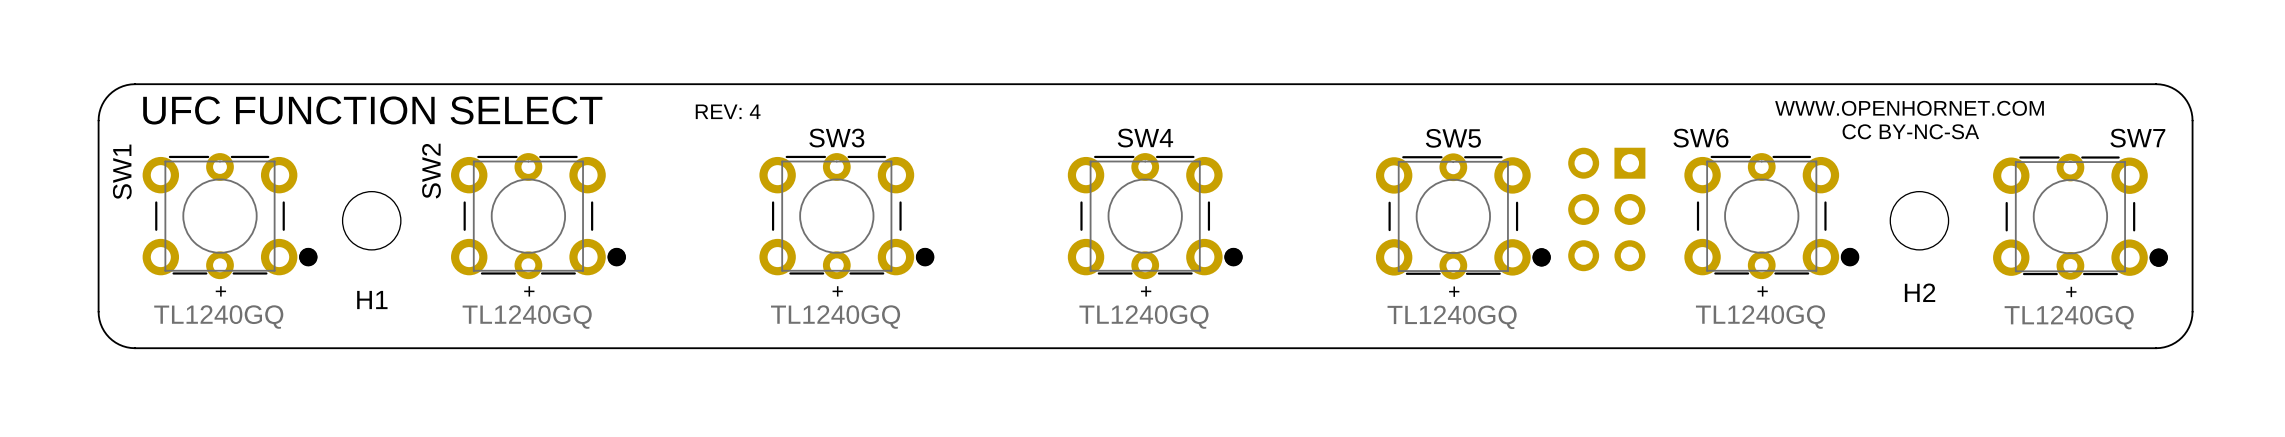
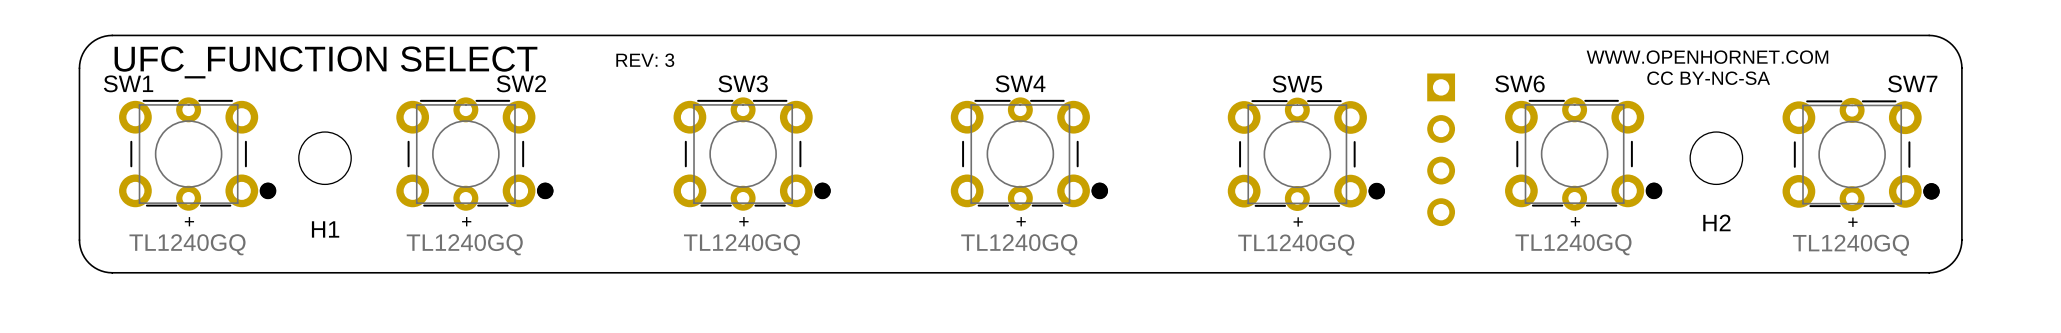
text: UFC FUNCTION SELECT (372, 110) -> UFC_FUNCTION SELECT (325, 62)
text: REV: 4 (728, 111) -> REV: 3 (645, 60)
part footprint: [1568, 147, 1646, 272] -> [1427, 73, 1456, 227]
SW2 name rotation: 0° (431, 171) -> 90° clockwise (521, 83)
SW2 name position: SW2 (431, 171) -> SW2 (521, 83)
SW1 name rotation: 0° (122, 172) -> 90° clockwise (128, 83)

